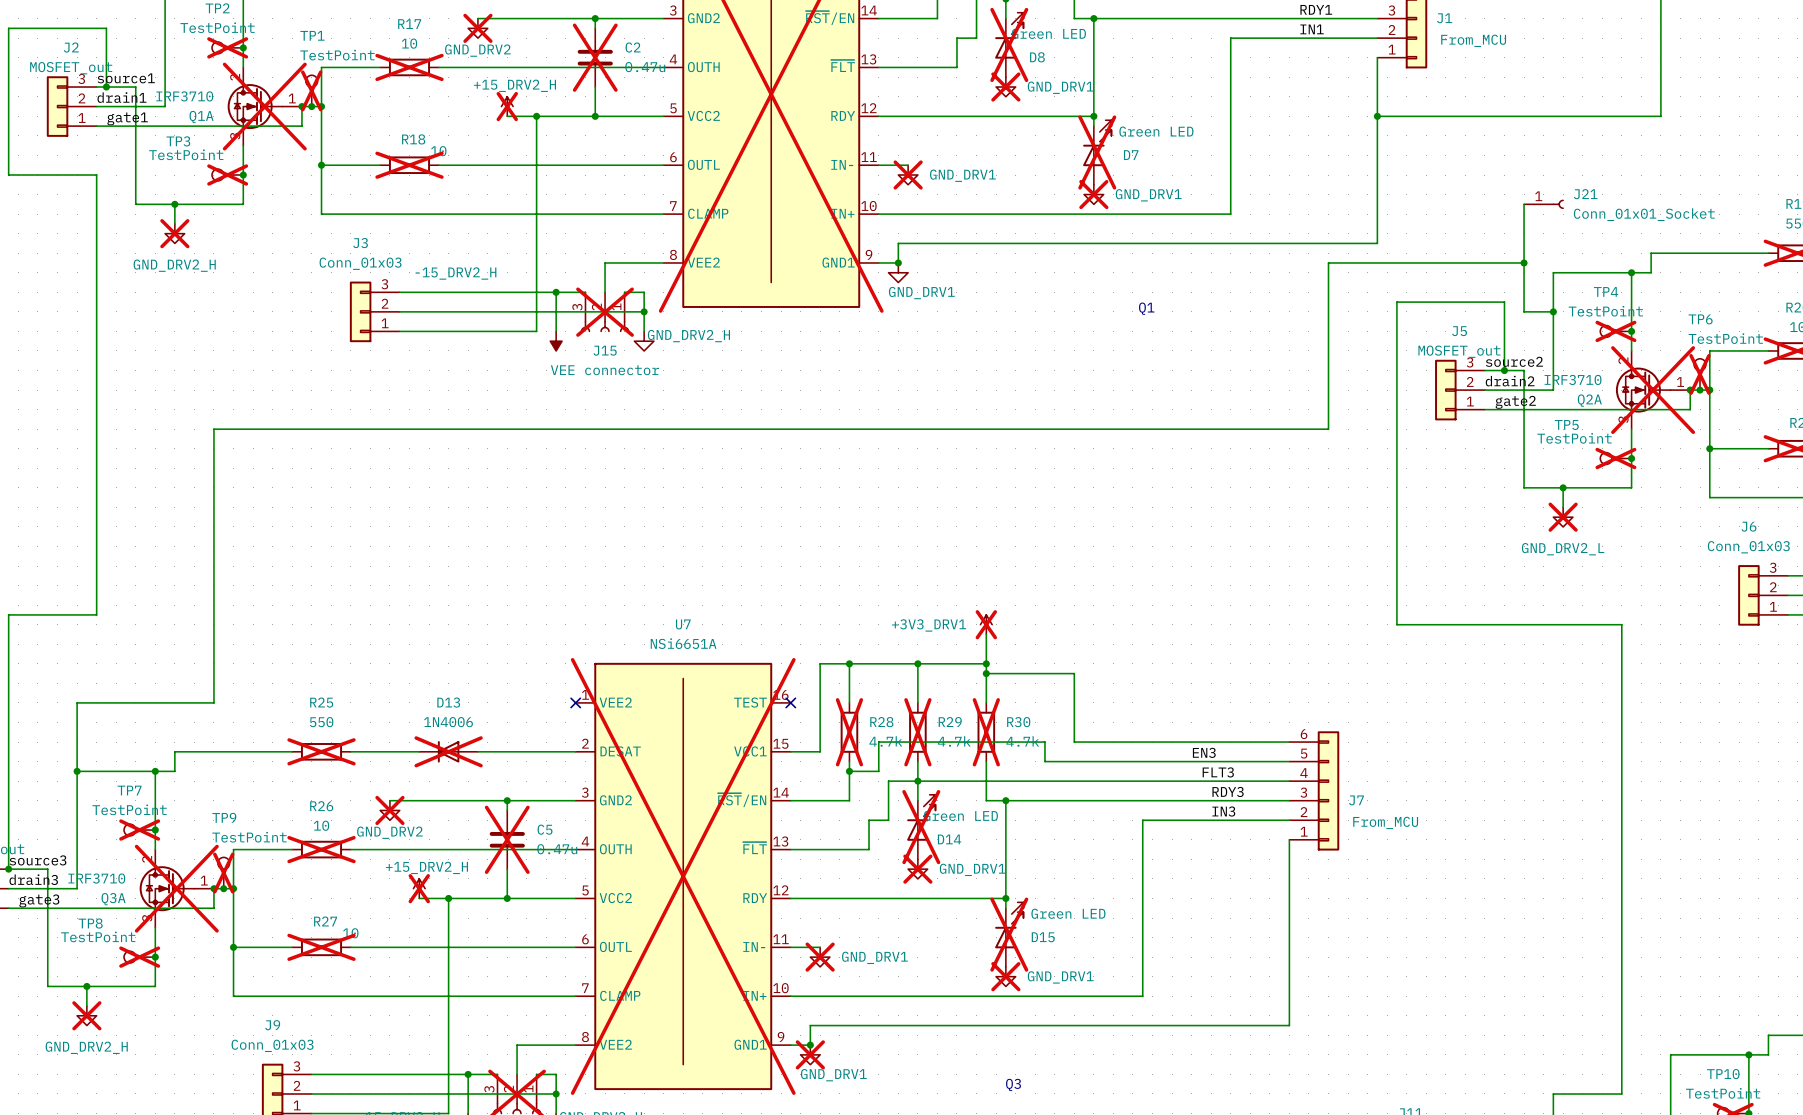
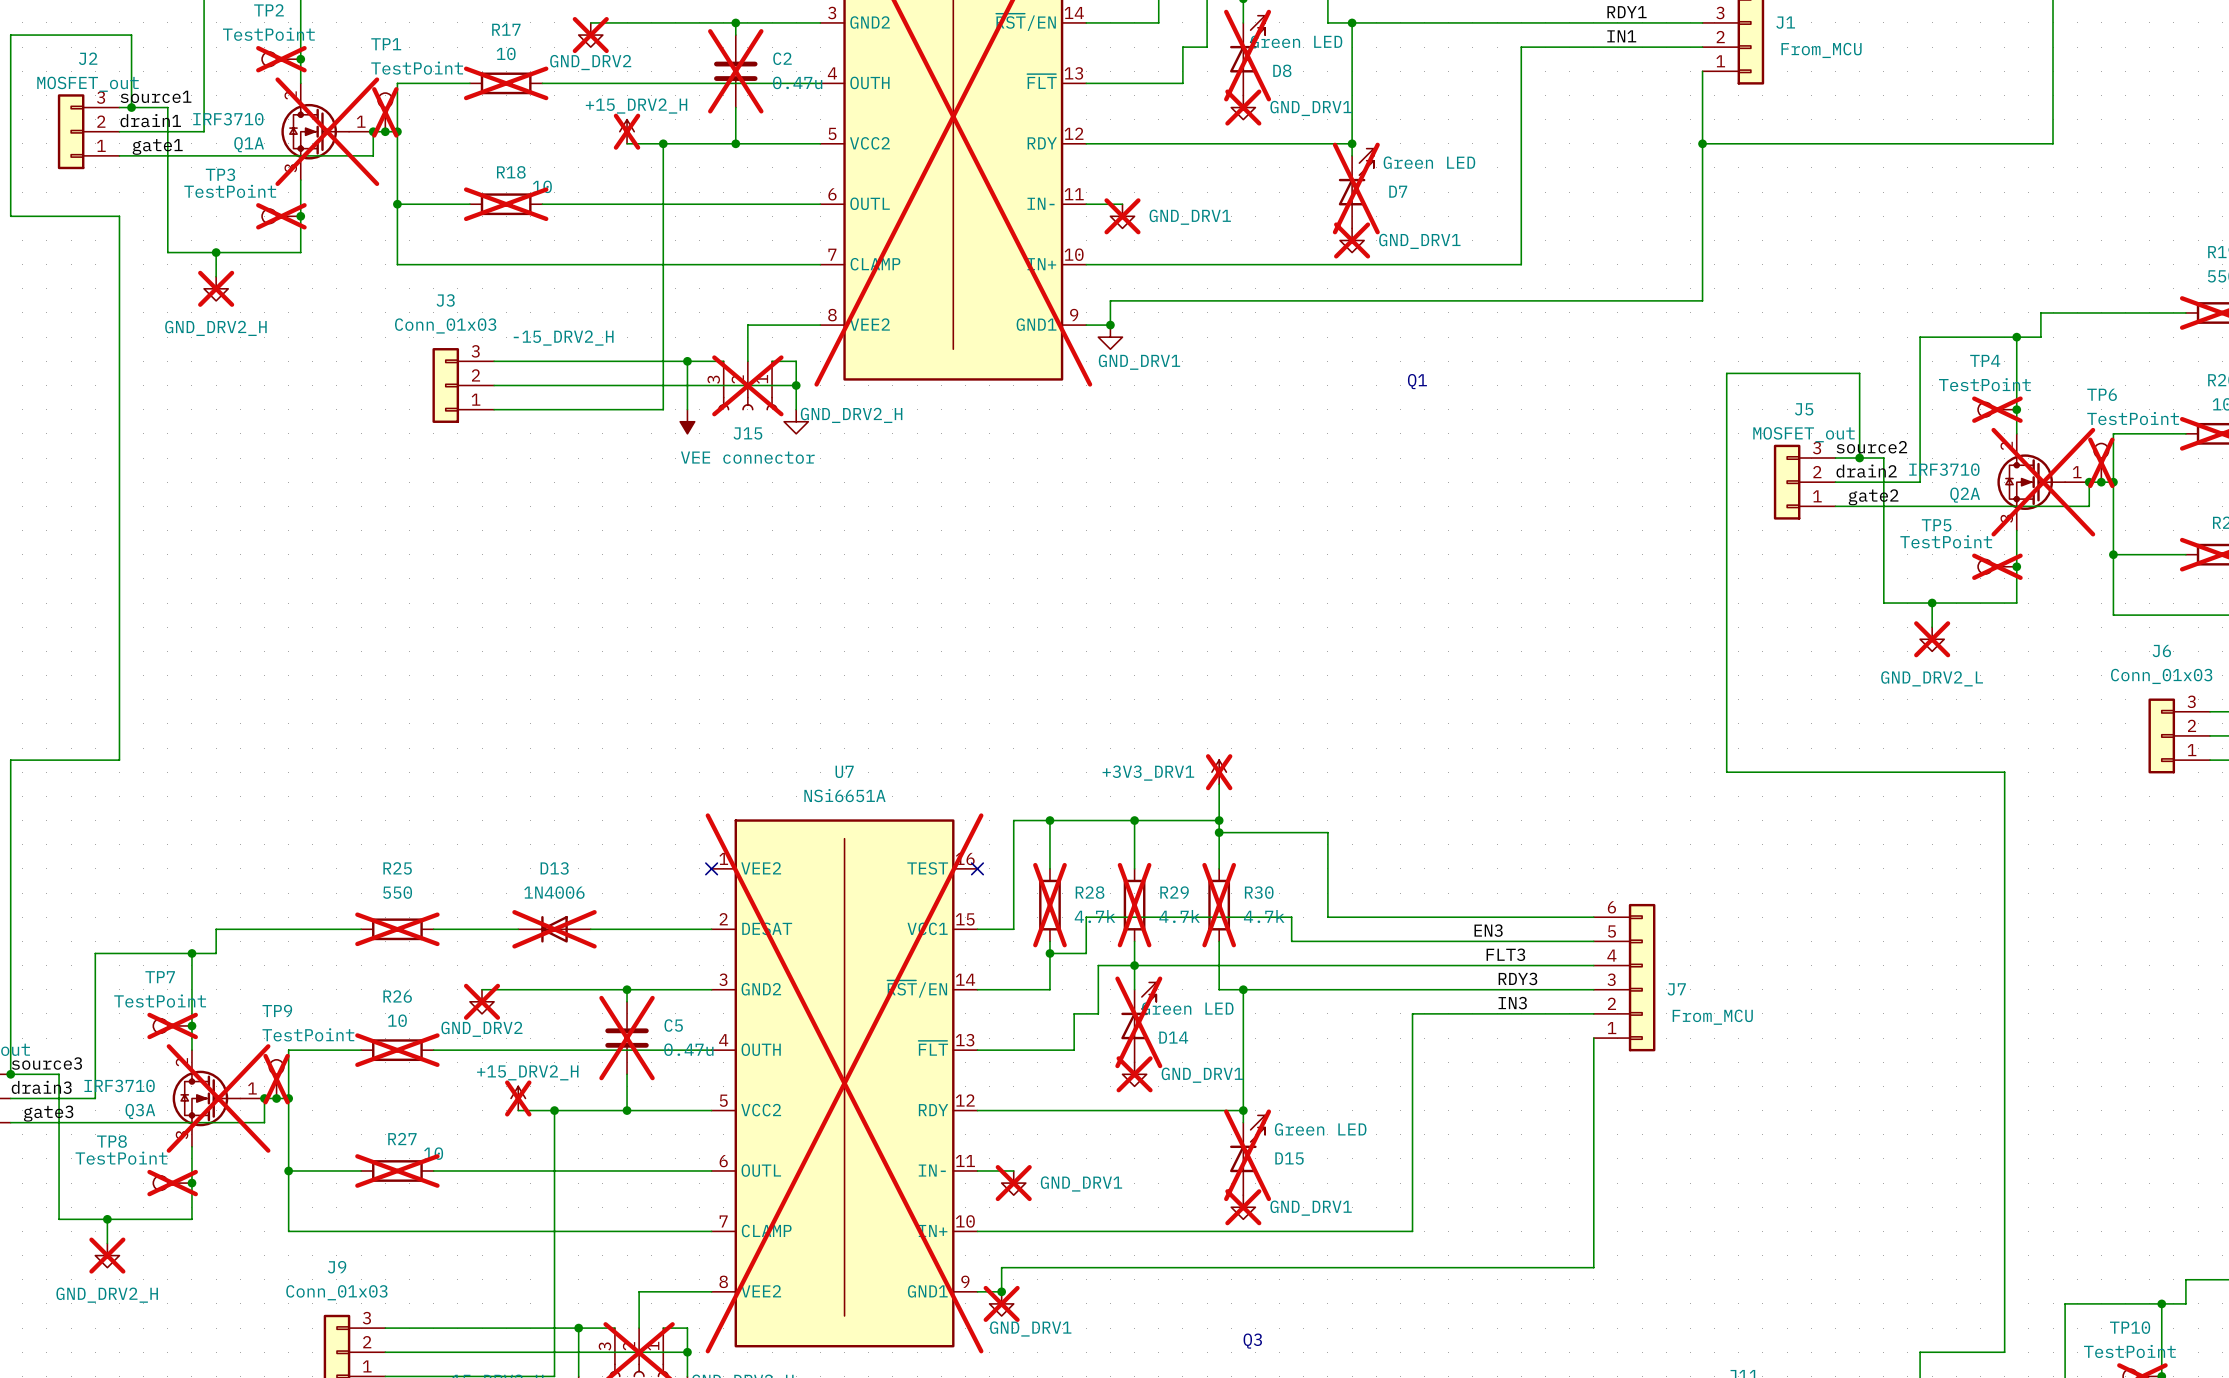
wire: (1524, 204) (1524, 311) (1553, 311) -> none
J21: Conn_01x01_Socket (1543, 204) -> none
wire: (1524, 262) (1328, 262) (1328, 429) (213, 429) (213, 702) (77, 702) (77, 771) -> none
junction: (1524, 262) -> none
junction: (1553, 311) -> none
junction: (77, 771) -> none

